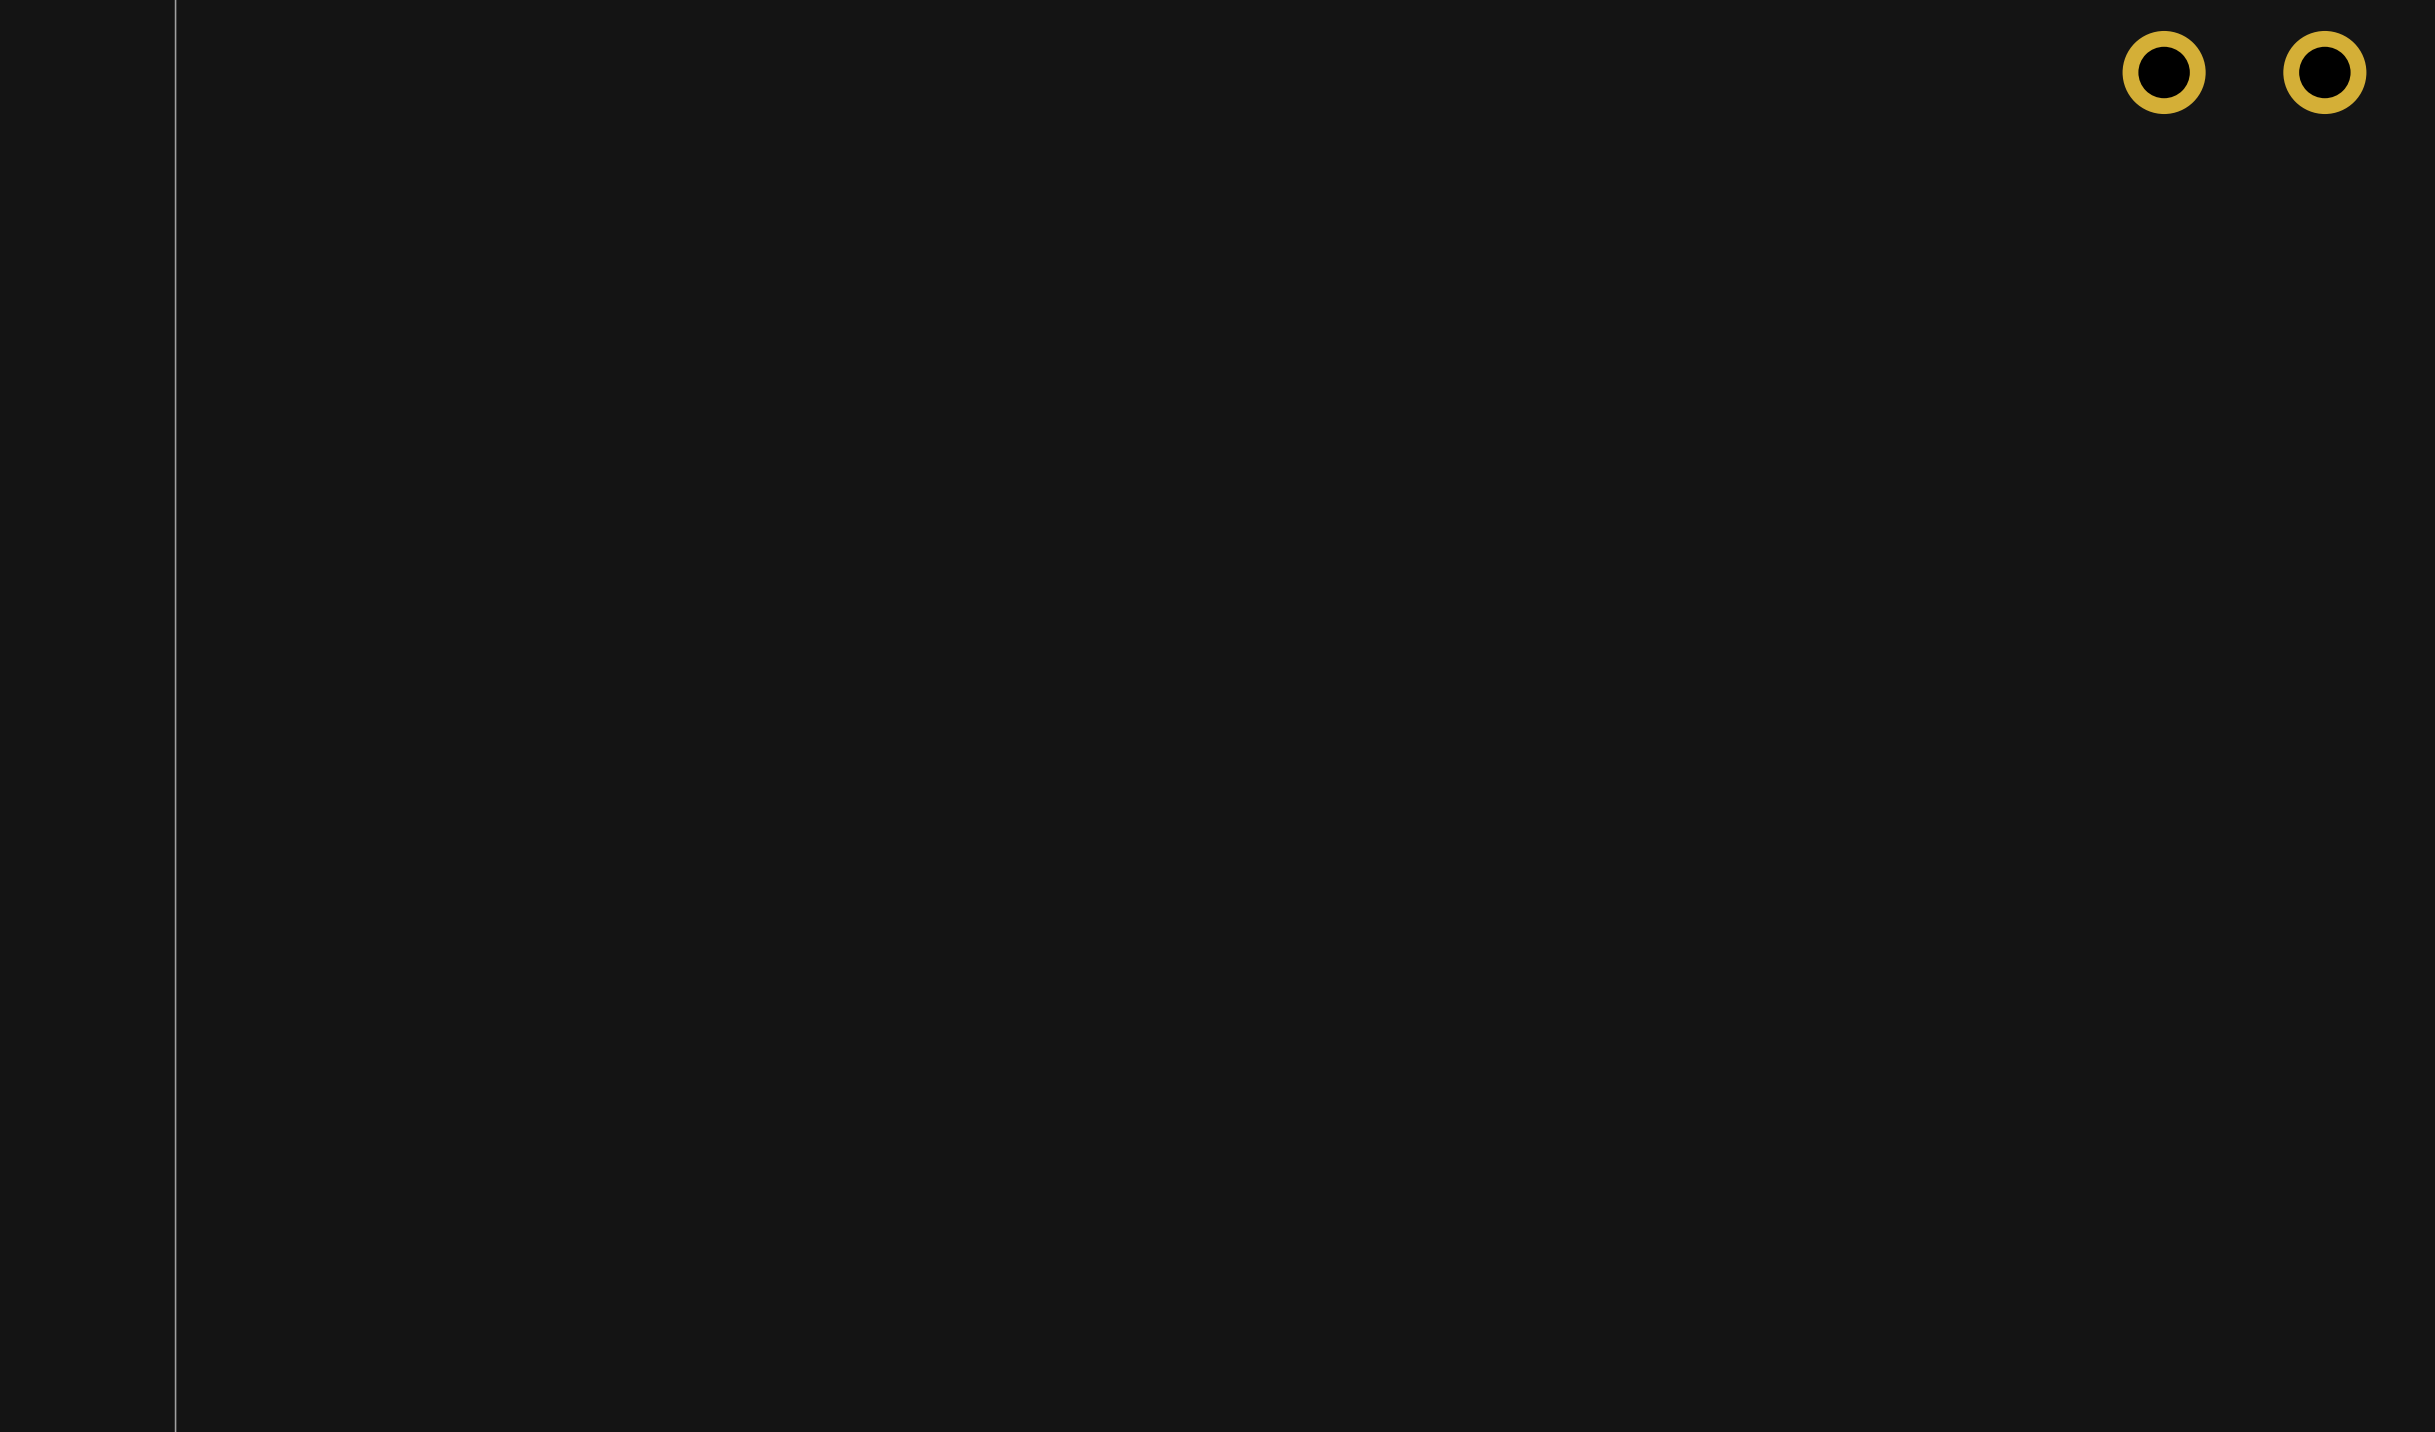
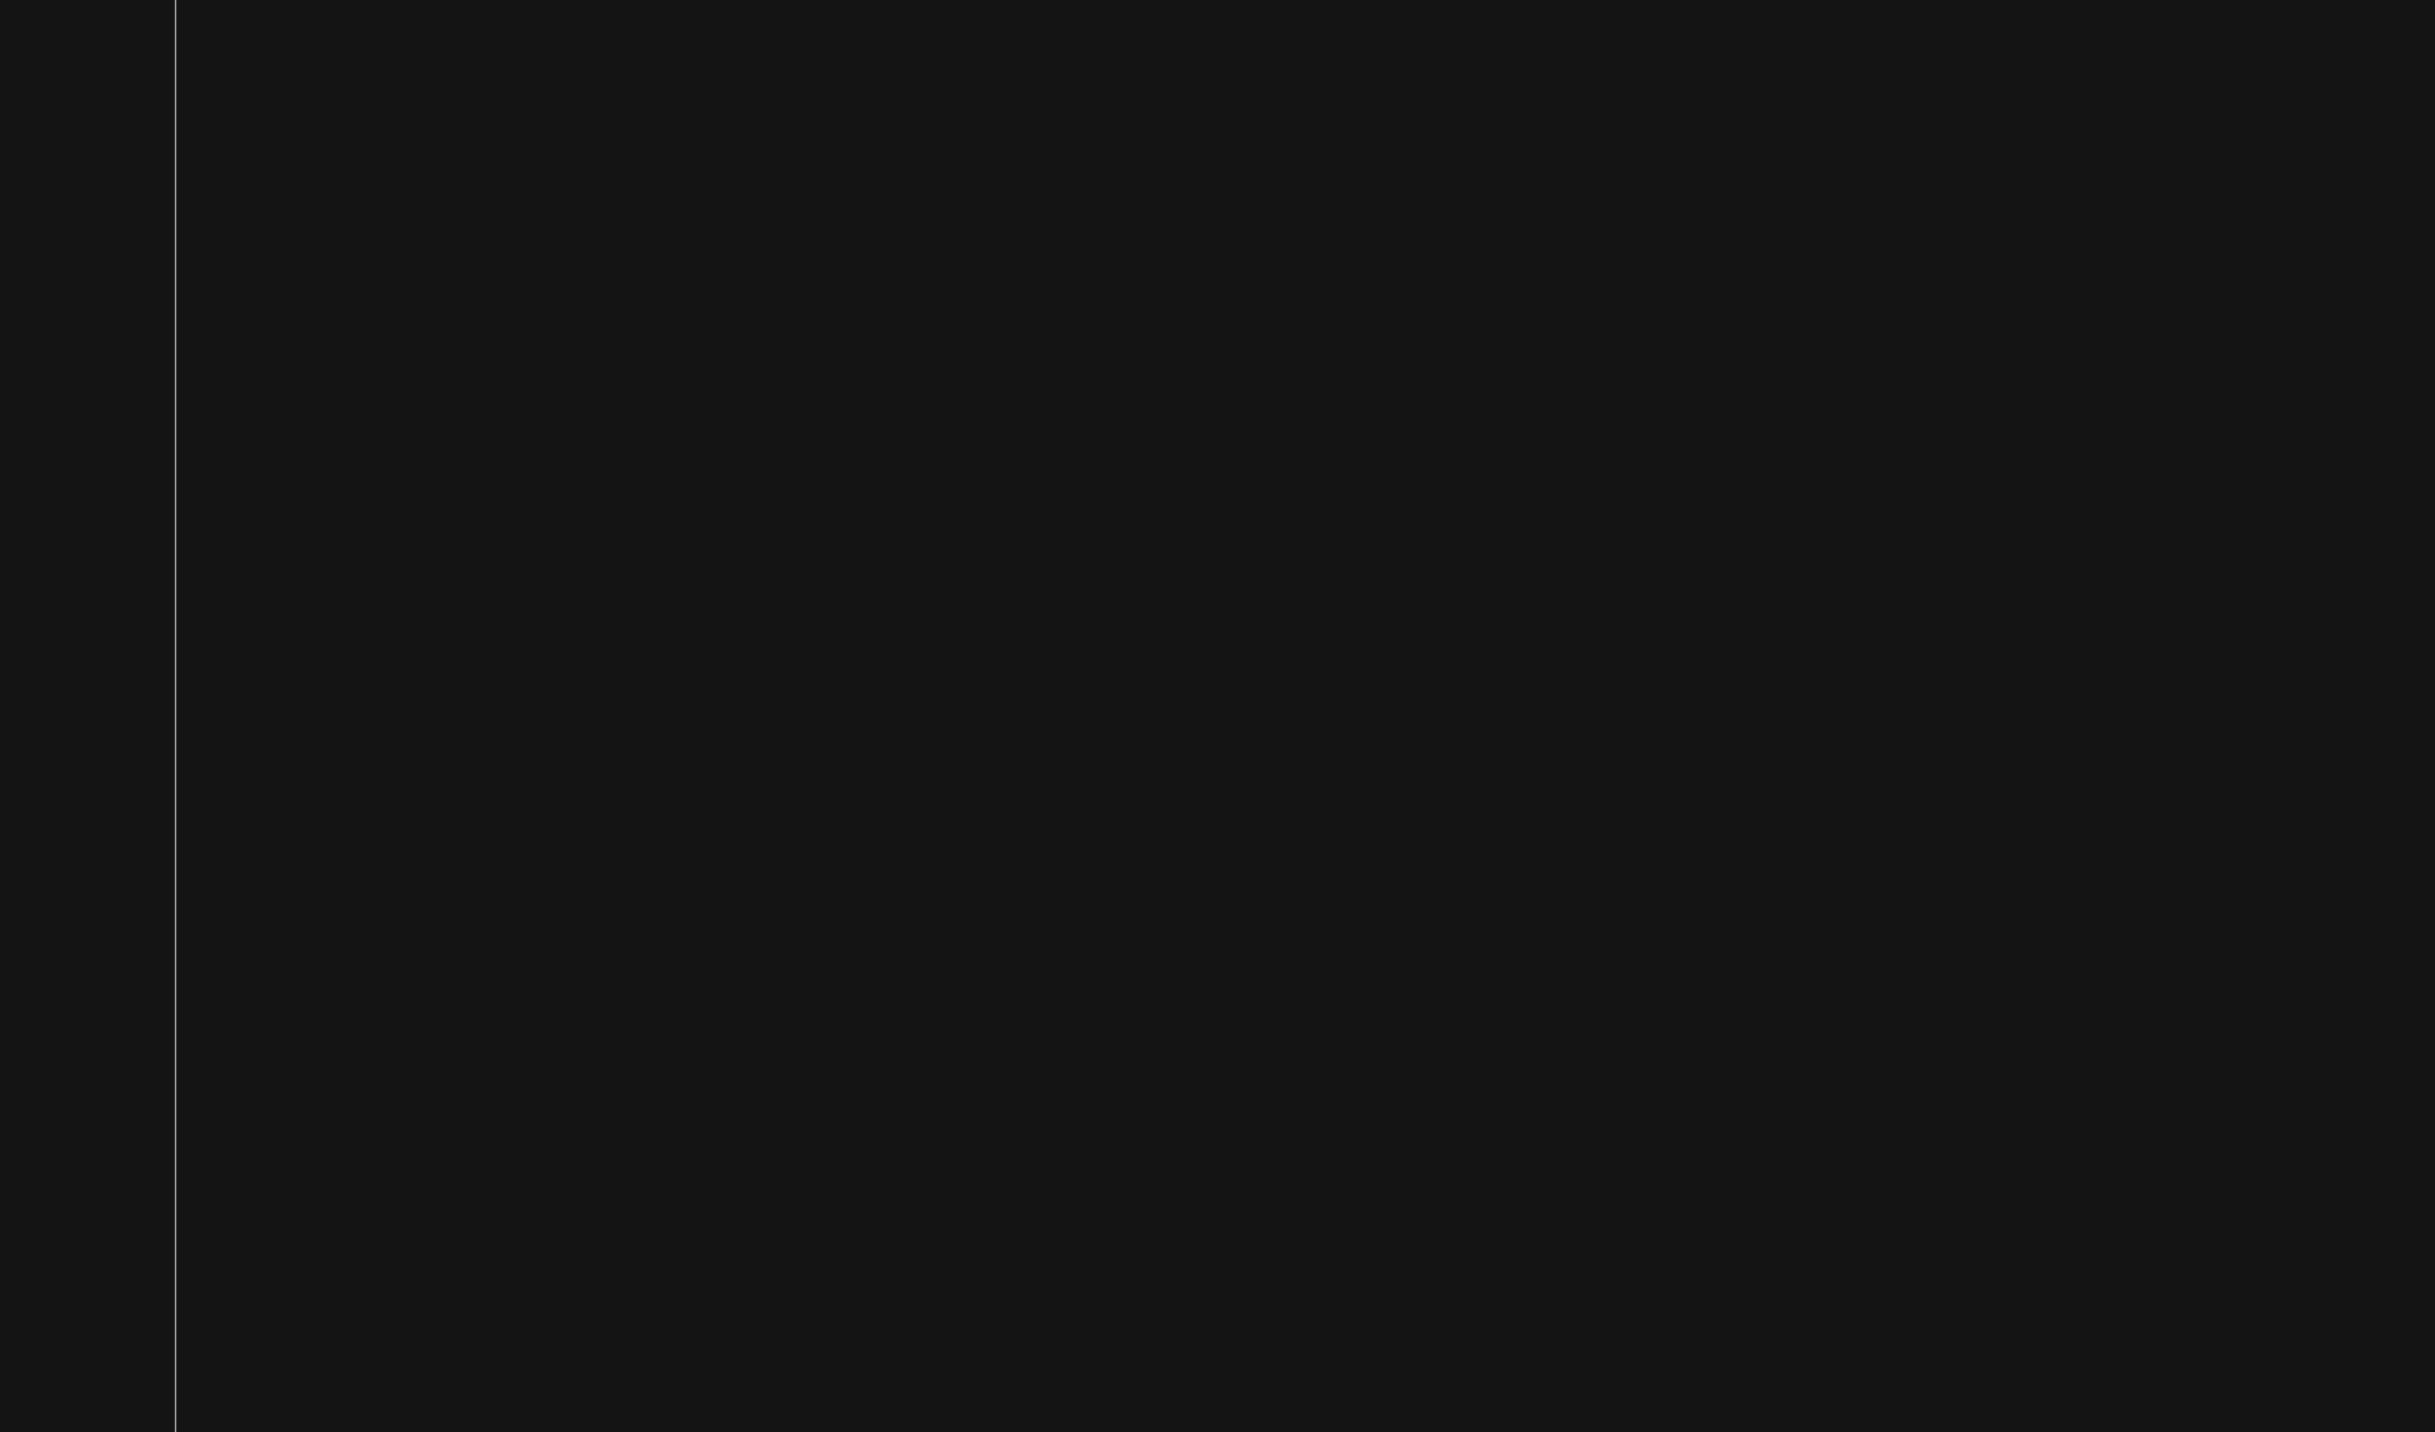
part: (2244, 72) -> none

